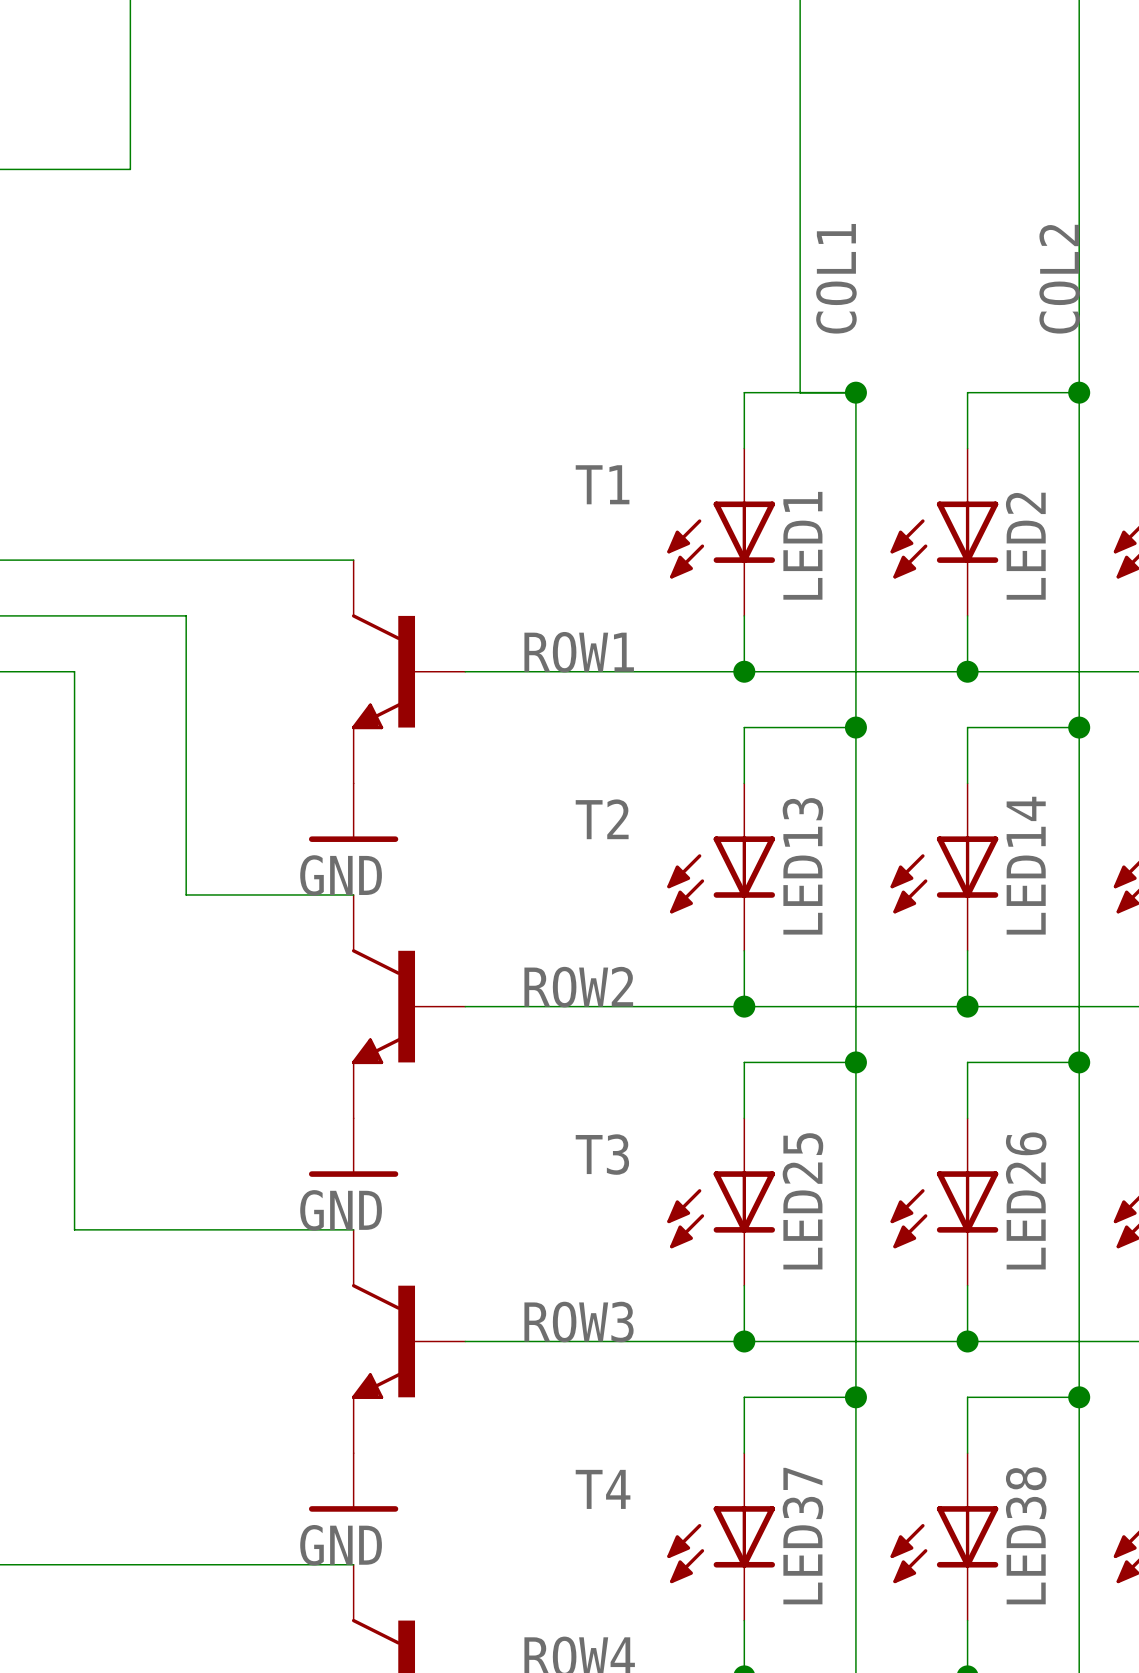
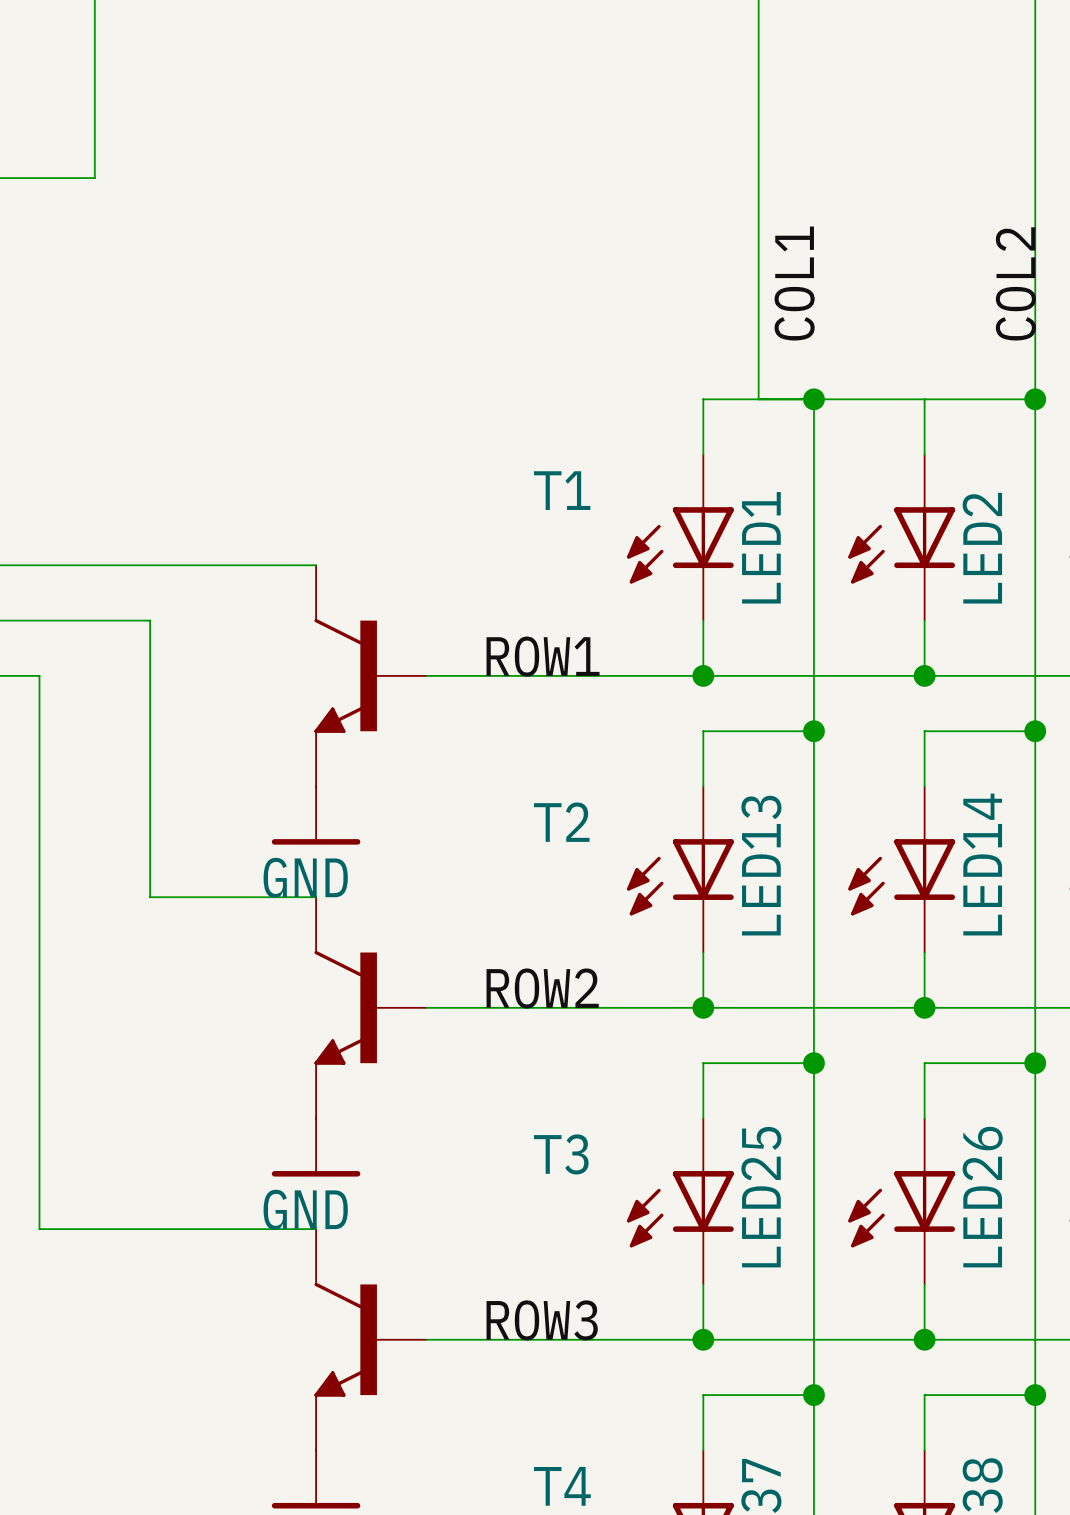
wire: none -> (813, 399) (924, 399)

